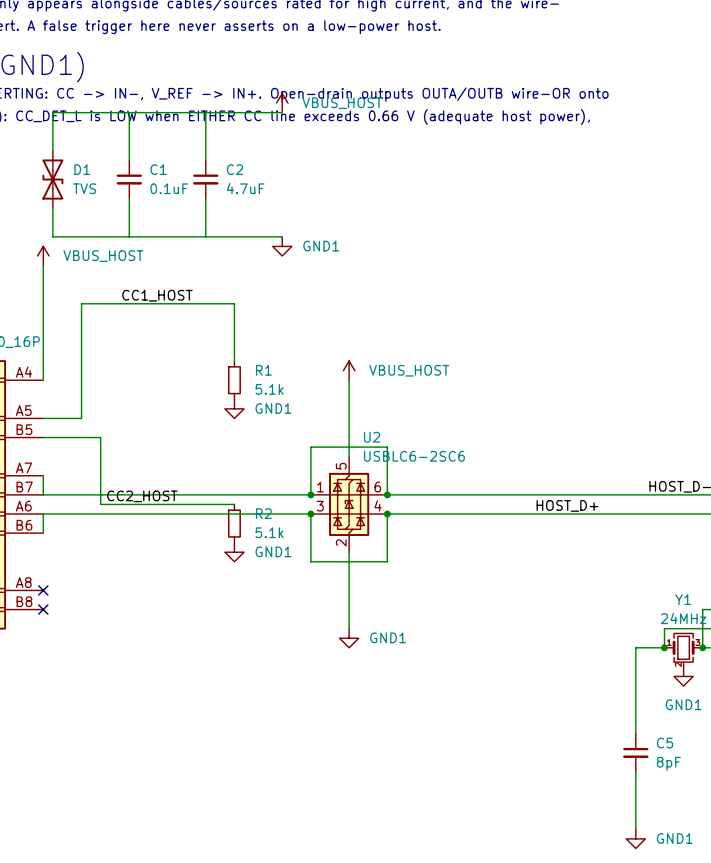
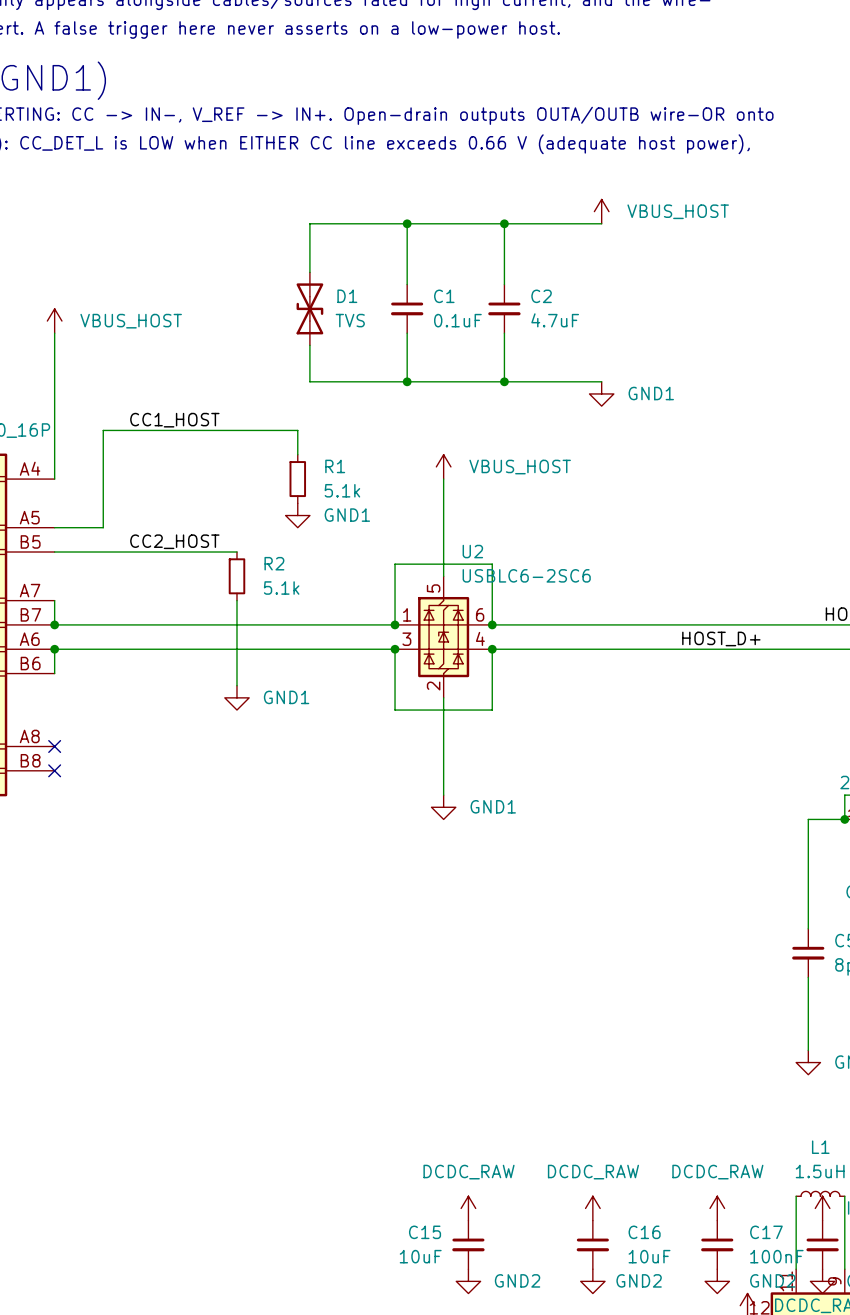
power symbol: VBUS_HOST (282, 103) -> none
wire: (129, 112) (129, 160) -> none
wire: (205, 112) (205, 160) -> (407, 223) (407, 284)
wire: (282, 112) (52, 112) (52, 150) -> none
power symbol: none -> VBUS_HOST (601, 211)
D1 position: (52, 179) -> (309, 308)
C1 position: (129, 179) -> (407, 308)
C2 position: (205, 179) -> (504, 308)
junction: none -> (407, 223)
wire: none -> (504, 223) (504, 284)
junction: none -> (504, 223)
wire: none -> (601, 223) (309, 223) (309, 272)
wire: (129, 198) (129, 236) -> none
wire: (205, 198) (205, 236) -> (407, 333) (407, 381)
wire: (52, 208) (52, 236) (282, 236) -> none
power symbol: GND1 (282, 246) -> none
wire: none -> (504, 333) (504, 381)
wire: none -> (309, 345) (309, 381) (601, 381)
label position: CC1_HOST (157, 295) -> CC1_HOST (174, 420)
junction: none -> (407, 381)
junction: none -> (504, 381)
power symbol: none -> GND1 (601, 393)
wire: (81, 341) (81, 303) (234, 303) (234, 341) -> (103, 430) (297, 430)
wire: (100, 437) (100, 504) (234, 504) -> (127, 552) (236, 552)
wire: none -> (236, 600) (236, 685)
junction: none -> (54, 624)
label position: CC2_HOST (142, 496) -> CC2_HOST (174, 541)
junction: none -> (54, 649)
R2 position: (234, 523) -> (236, 576)
power symbol position: GND1 (234, 552) -> GND1 (236, 697)

